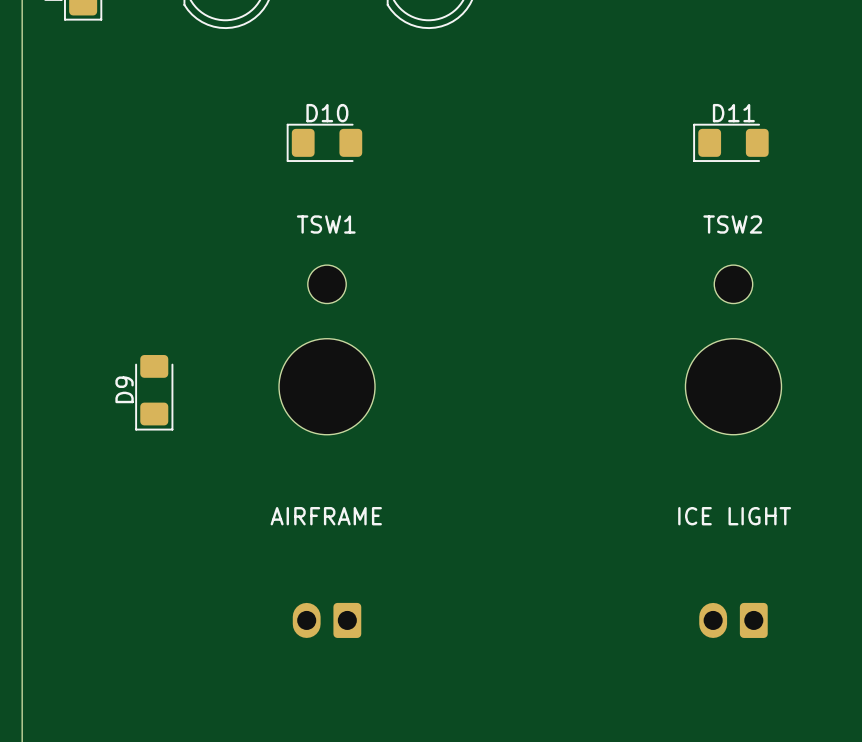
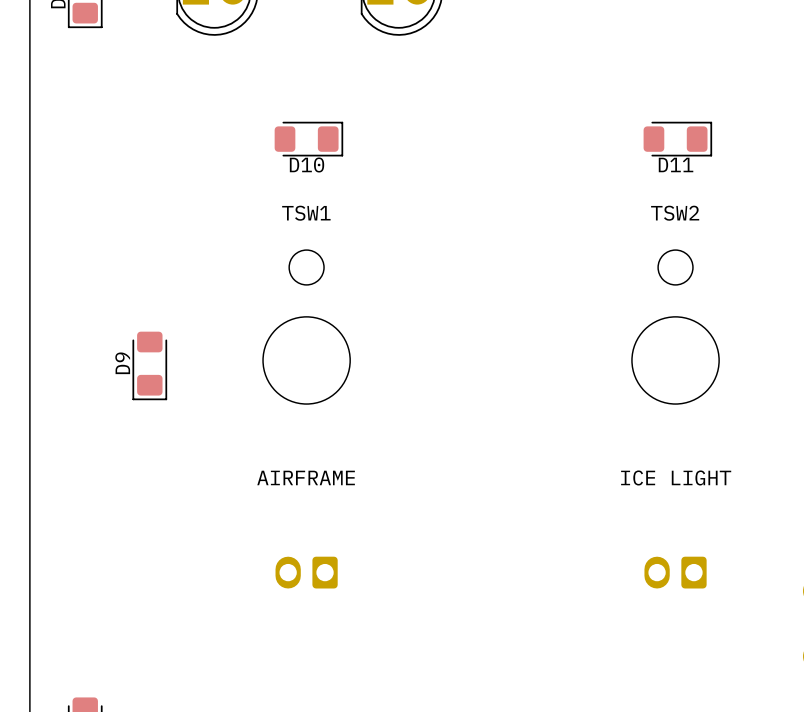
D10 rotation: 0° (324, 142) -> 180° (308, 139)
D11 rotation: 0° (730, 142) -> 180° (677, 139)

